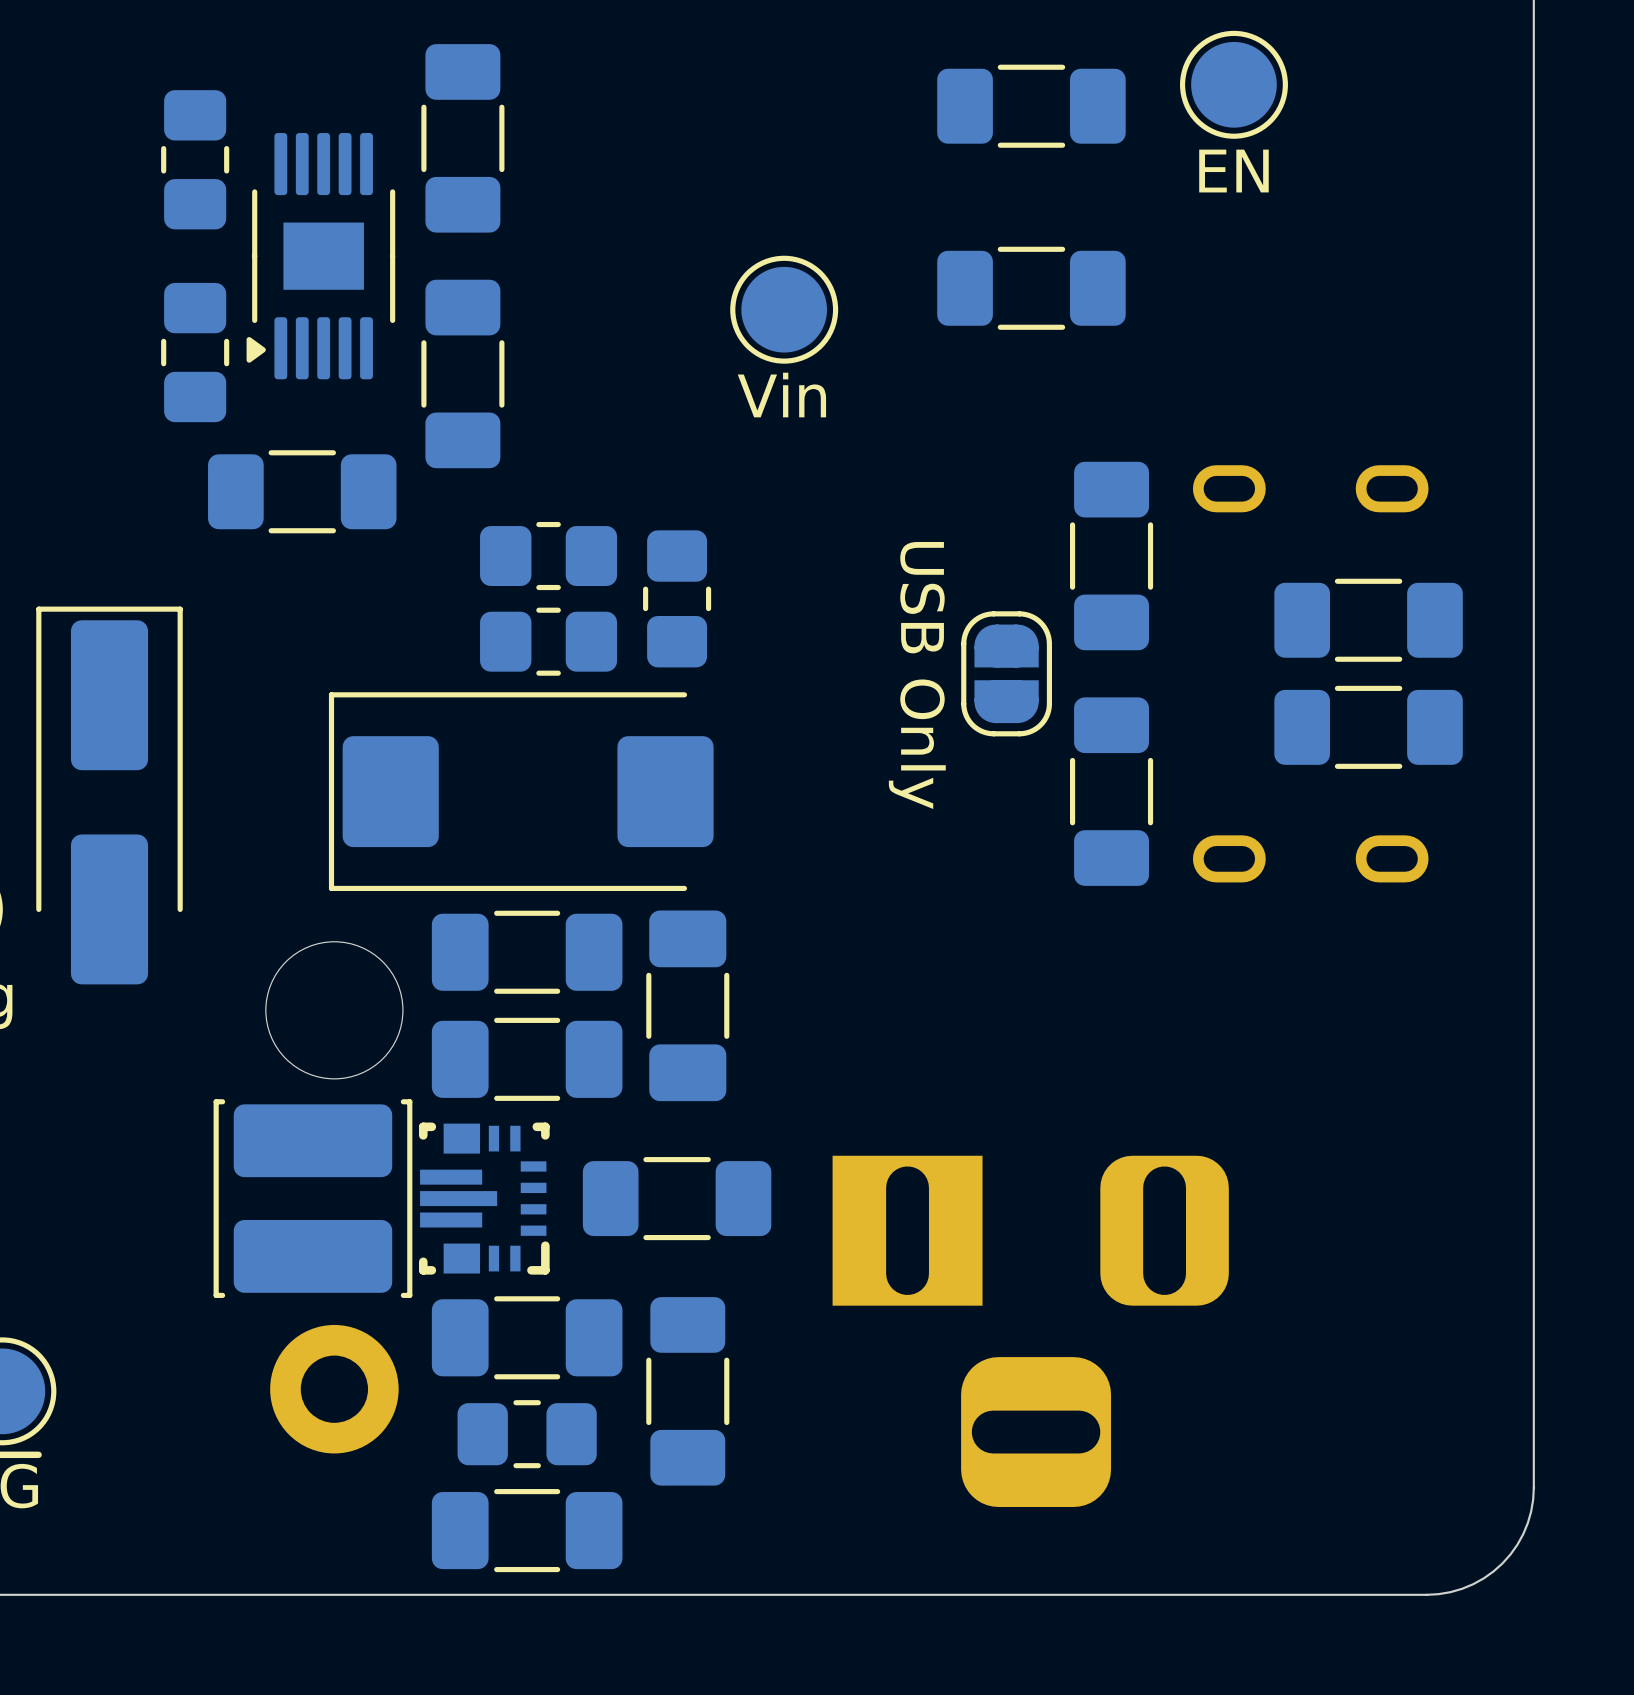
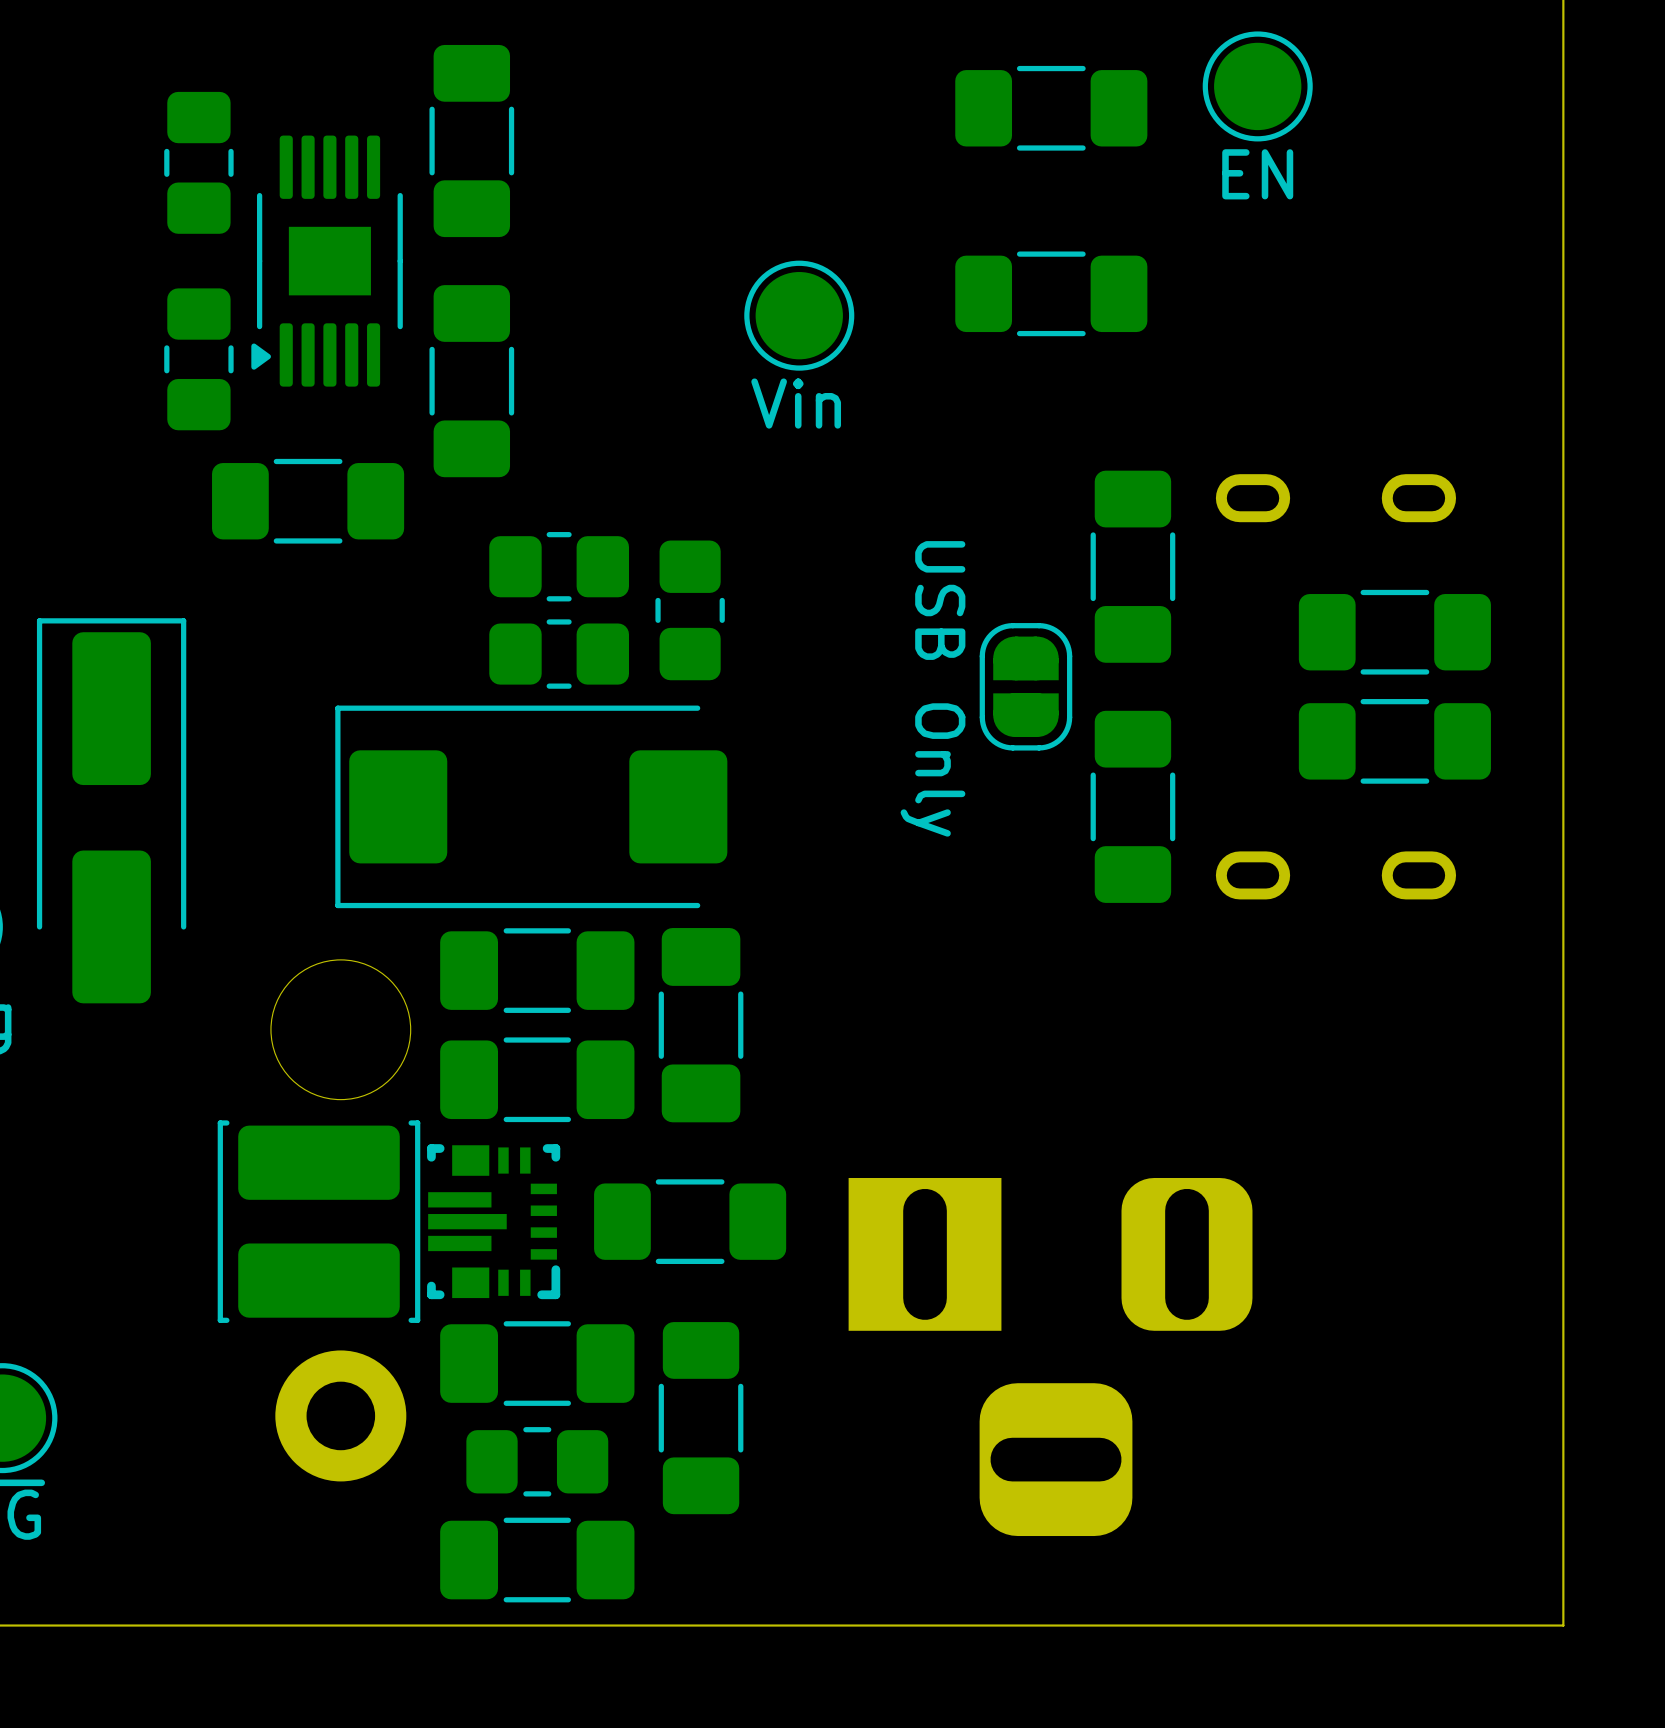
board edge: (1533, 1487) (1531, 1511) (1523, 1534) (1502, 1563) (1483, 1578) (1462, 1588) (1426, 1594) -> (1563, 1516) (1563, 1625) (1454, 1625)

